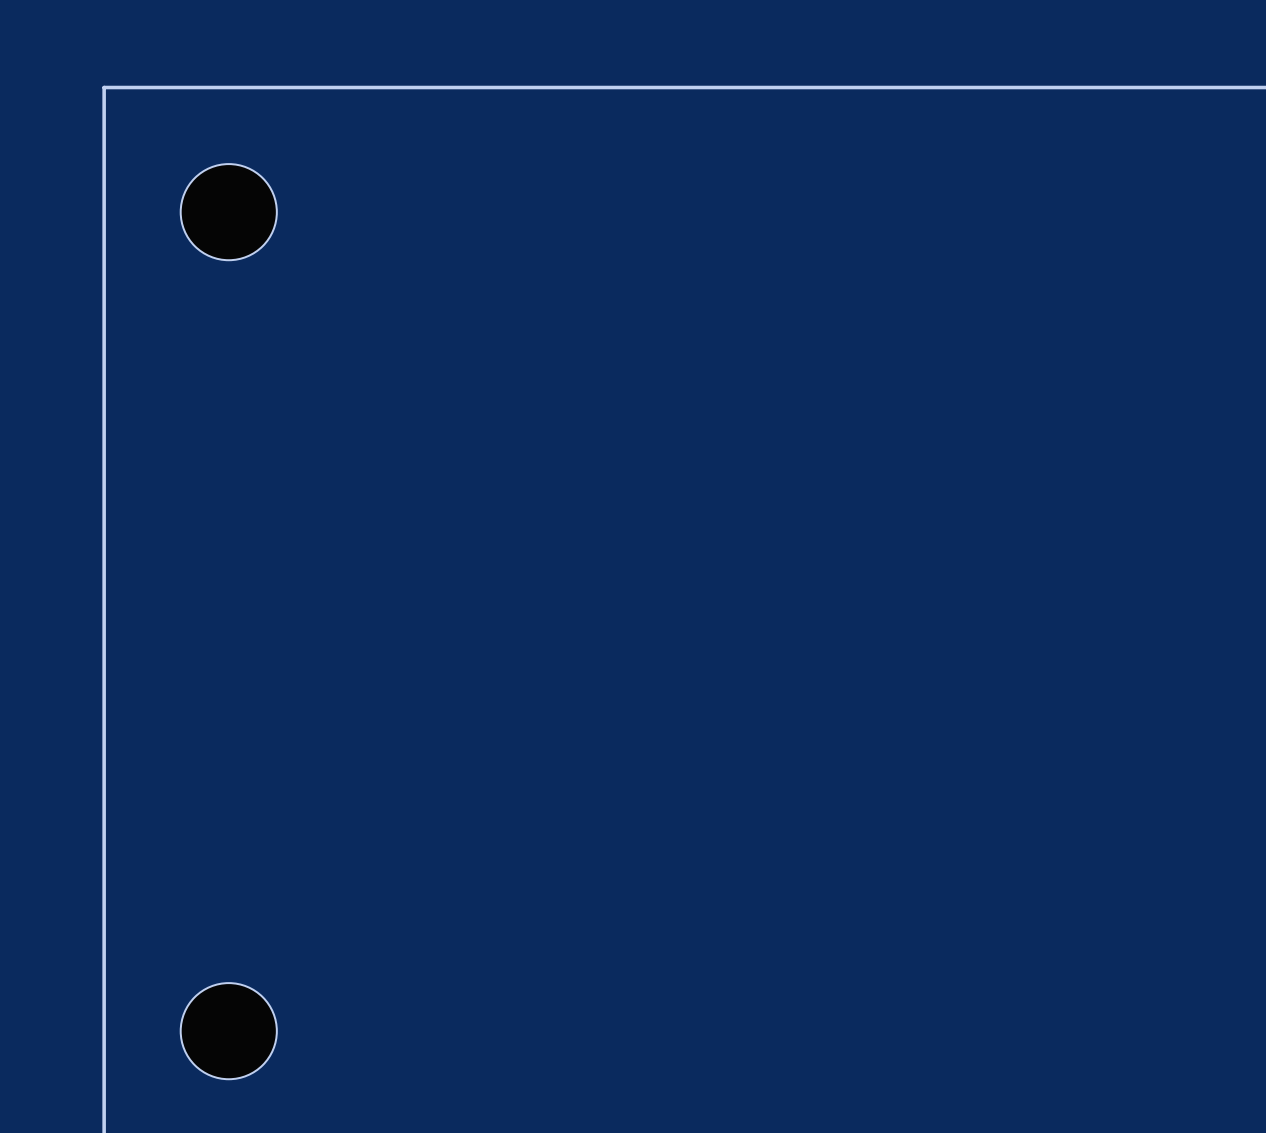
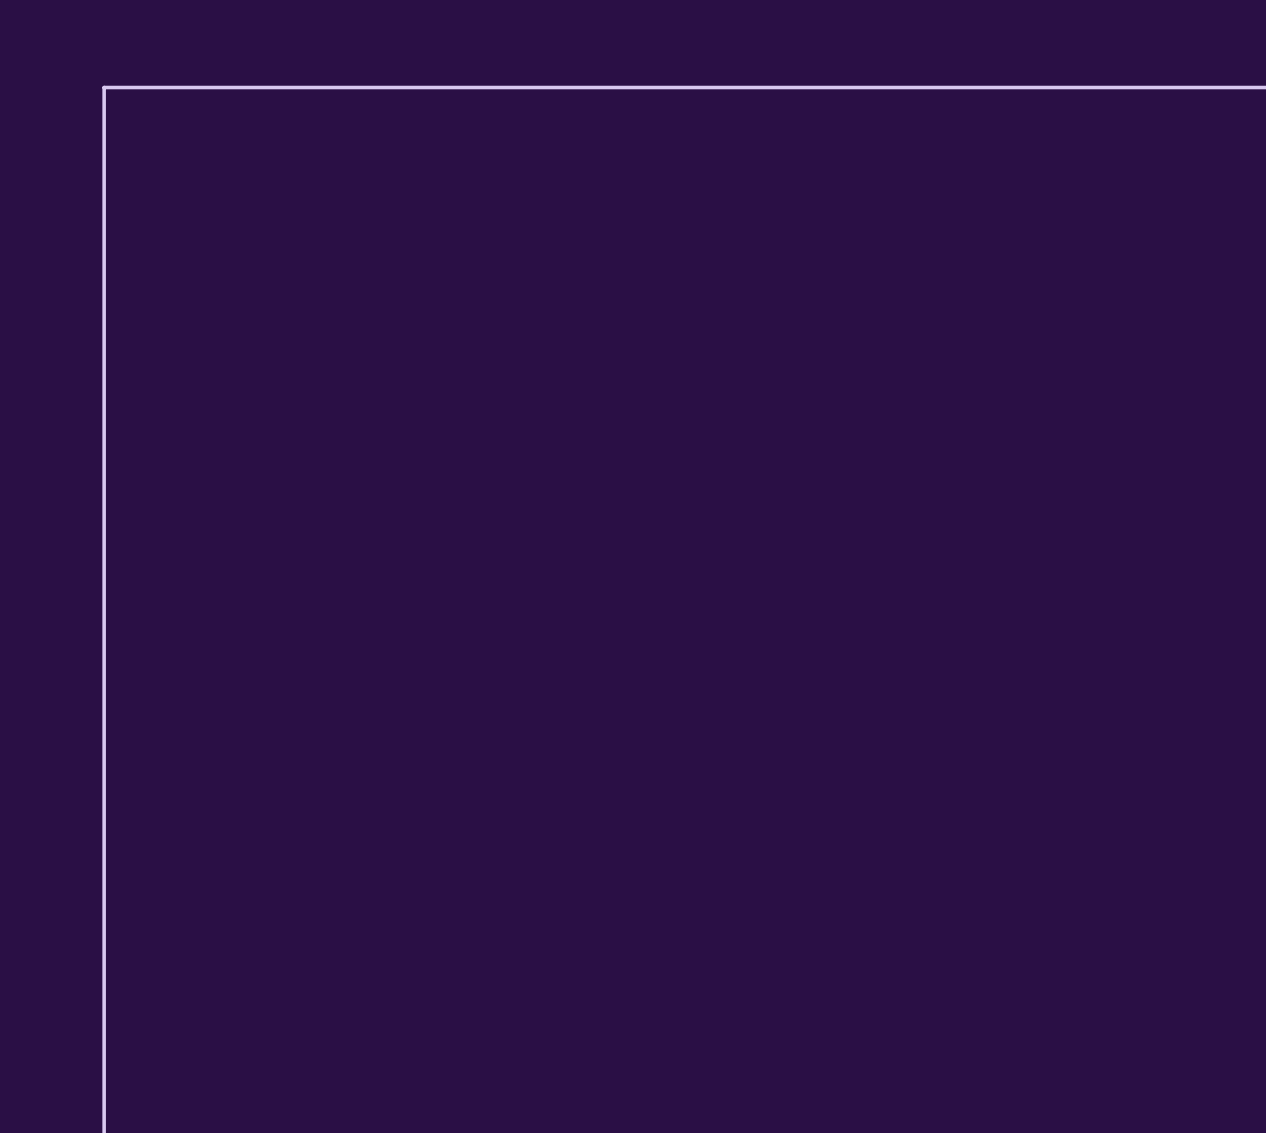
part: (228, 212) -> none
part: (228, 1031) -> none

